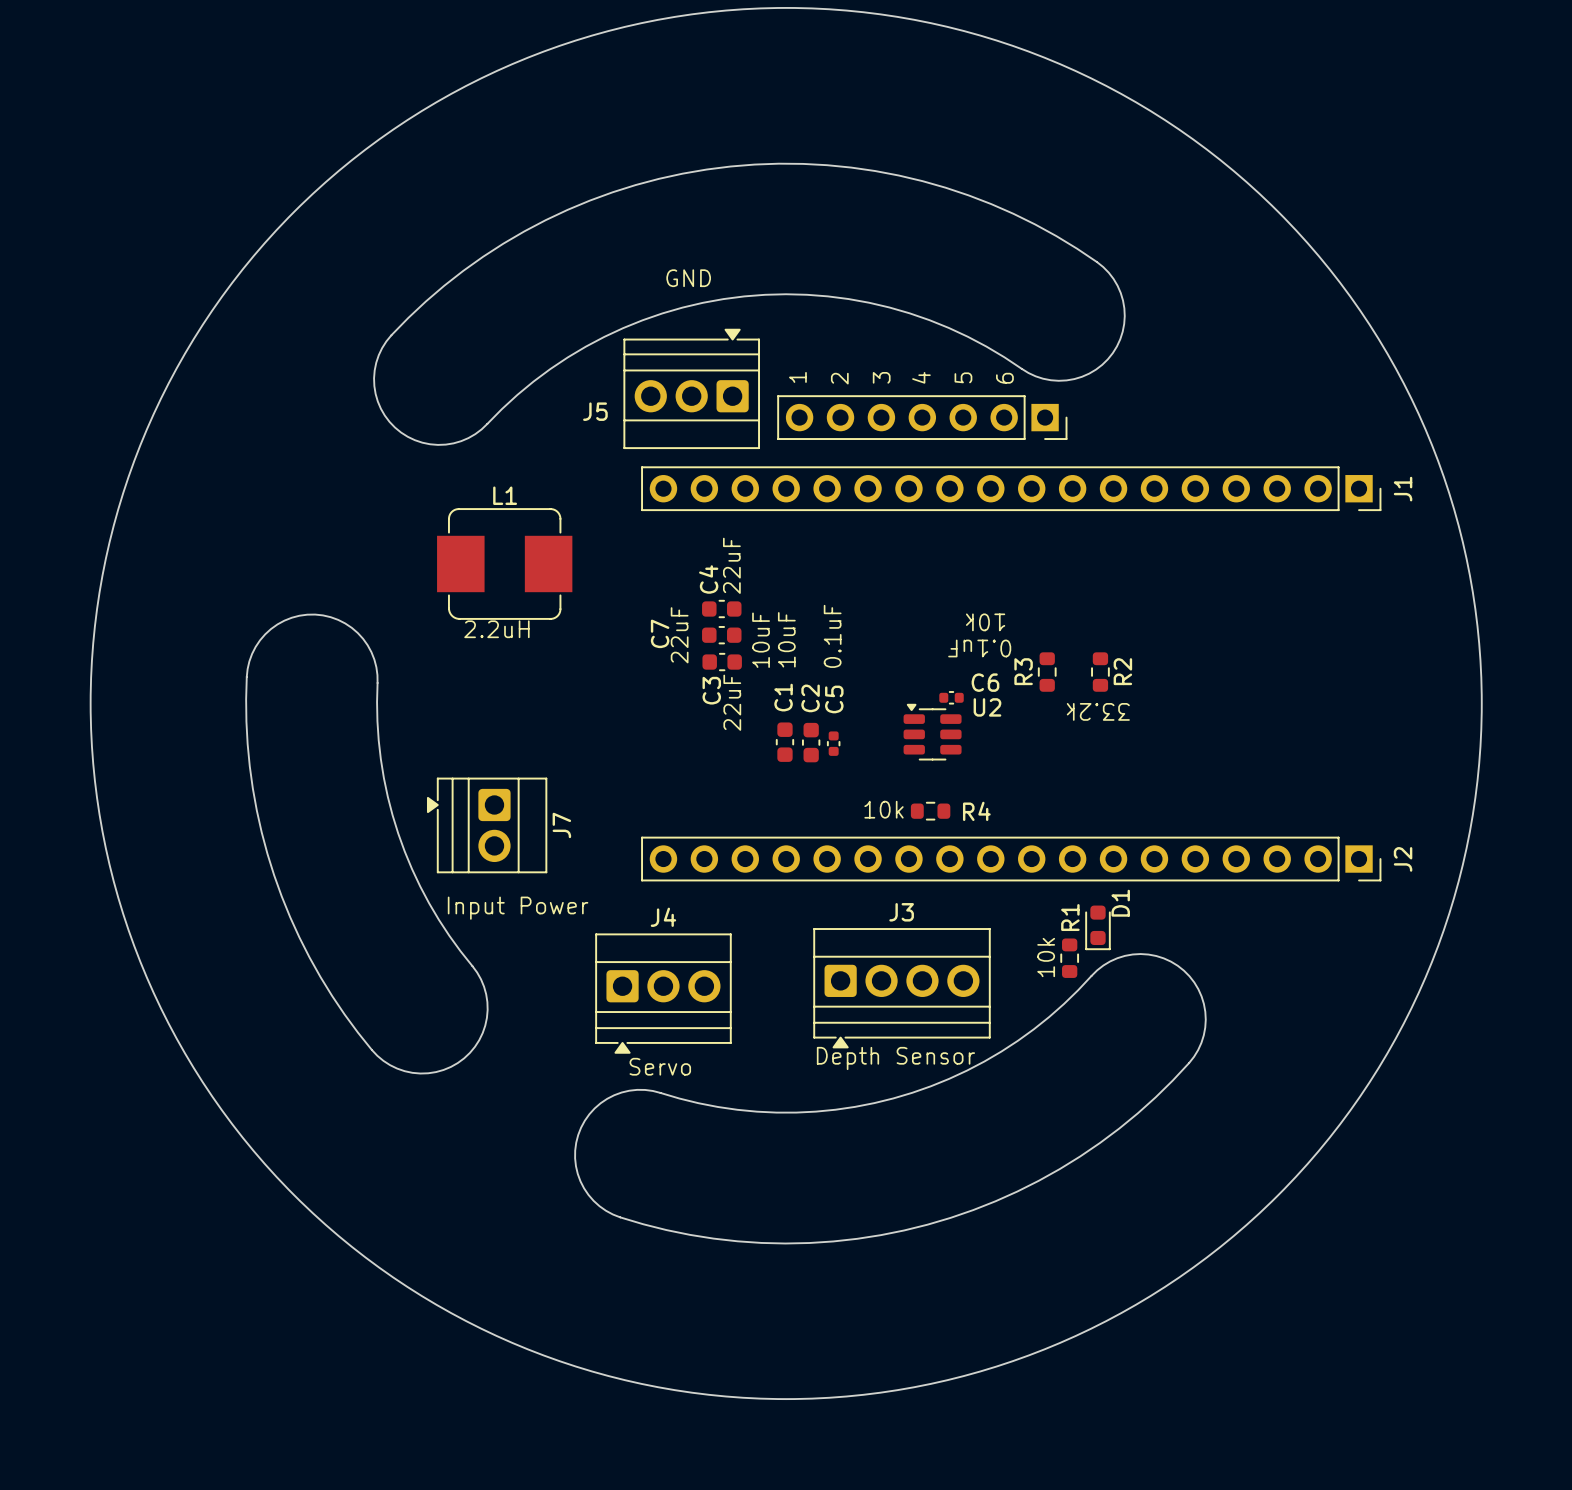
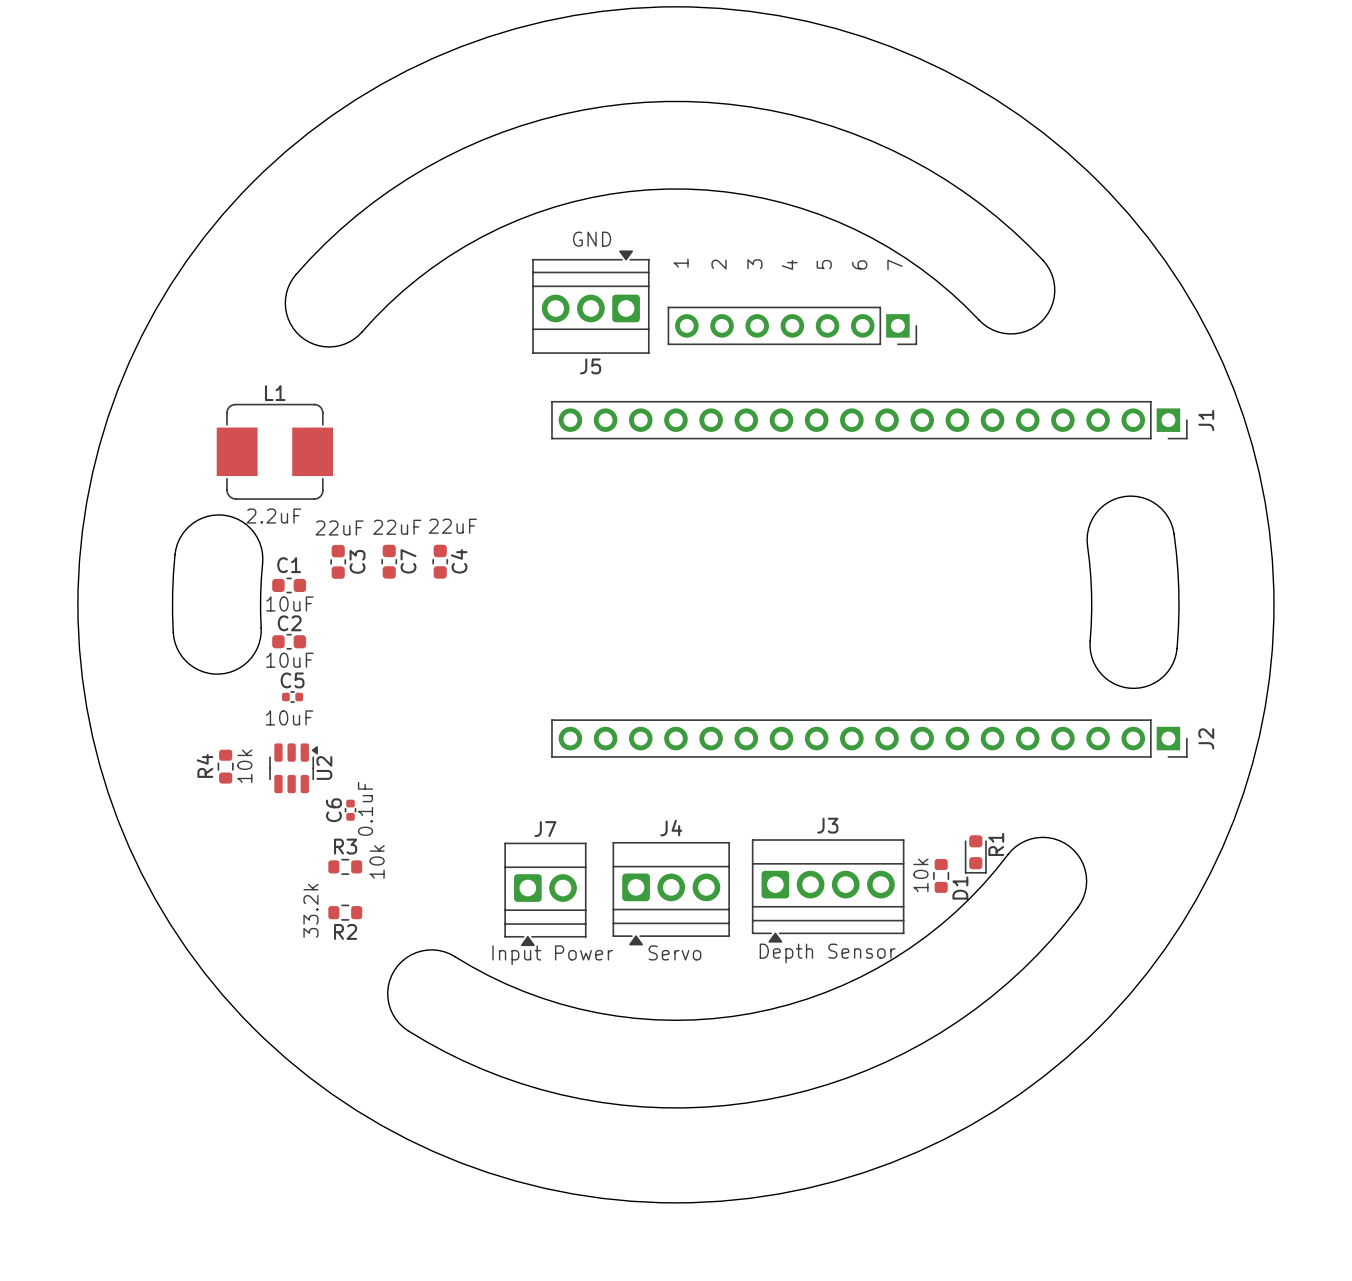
board edge: (1097, 262) (1056, 236) (991, 204) (945, 187) (898, 175) (851, 167) (803, 163) (730, 166) (682, 173) (635, 185) (567, 209) (524, 231) (463, 270) (425, 301) (386, 341) (376, 362) (374, 378) (375, 393) (384, 415) (401, 432) (422, 442) (437, 444) (453, 443) (468, 438) (481, 429) (517, 394) (550, 369) (585, 346) (623, 328) (662, 313) (702, 302) (744, 296) (786, 294) (848, 299) (909, 313) (967, 336) (1035, 376) (1050, 380) (1074, 379) (1089, 373) (1107, 359) (1116, 346) (1122, 331) (1124, 308) (1120, 292) (1113, 278) (1097, 262) -> (1043, 260) (997, 217) (963, 191) (928, 169) (871, 140) (811, 120) (750, 106) (708, 102) (645, 102) (582, 110) (521, 125) (462, 148) (425, 168) (372, 202) (324, 243) (292, 278) (286, 293) (285, 303) (290, 323) (304, 339) (319, 345) (340, 345) (358, 335) (388, 303) (417, 278) (449, 256) (482, 236) (535, 213) (572, 202) (610, 194) (648, 189) (706, 190) (744, 194) (782, 202) (837, 221) (872, 238) (905, 257) (951, 293) (983, 323) (1003, 333) (1015, 333) (1031, 328) (1048, 313) (1054, 297) (1054, 285) (1049, 269) (1043, 260)
text: none -> 7 (894, 264)
text position: 1 (797, 377) -> 1 (681, 263)
text position: 3 (881, 377) -> 3 (754, 264)
text position: 4 (921, 377) -> 4 (789, 264)
text position: 5 (963, 377) -> 5 (824, 264)
text position: 2 (839, 378) -> 2 (719, 264)
text position: 6 (1004, 378) -> 6 (859, 264)
J5 position: (691, 388) -> (590, 302)
J5 name position: J5 (595, 411) -> J5 (590, 366)
part position: (922, 417) -> (792, 325)
L1 position: (504, 563) -> (274, 451)
text: 22uF (731, 565) -> none
text: none -> 2.2uF (273, 516)
C4 rotation: 0° (721, 609) -> 90° clockwise (440, 561)
C4 position: (721, 609) -> (440, 561)
text: none -> 22uF (452, 526)
text: none -> 22uF (397, 527)
text: none -> 22uF (339, 527)
board edge: none -> (1174, 533) (1171, 522) (1161, 508) (1147, 499) (1136, 496) (1119, 497) (1108, 502) (1095, 513) (1090, 523) (1087, 540) (1091, 593) (1090, 651) (1093, 661) (1102, 674) (1119, 686) (1135, 688) (1155, 682) (1167, 672) (1174, 658) (1178, 610) (1174, 533)
text: 10k (985, 622) -> none
text: 2.2uH (496, 629) -> none
C7 name position: C7 (660, 633) -> C7 (408, 561)
text: 22uF (679, 635) -> none
C7 rotation: 0° (721, 635) -> 90° clockwise (389, 561)
C7 position: (721, 635) -> (389, 561)
text: 0.1uF (832, 636) -> none
text: 10uF (786, 639) -> none
text: 10uF (761, 640) -> none
board edge: none -> (175, 554) (172, 593) (173, 632) (179, 652) (189, 664) (203, 672) (224, 673) (239, 667) (251, 657) (260, 638) (262, 558) (257, 537) (247, 525) (238, 519) (223, 515) (207, 516) (193, 523) (185, 530) (177, 544) (175, 554)
text: 0.1uF (979, 648) -> none
C3 rotation: 0° (722, 662) -> 90° clockwise (338, 561)
C3 position: (722, 662) -> (338, 561)
R3 rotation: 0° (1047, 672) -> 90° clockwise (345, 866)
R3 position: (1047, 672) -> (345, 866)
R2 rotation: 0° (1100, 672) -> 90° clockwise (345, 912)
R2 position: (1100, 672) -> (345, 912)
board edge: (246, 676) (247, 744) (256, 810) (274, 875) (290, 917) (309, 957) (344, 1014) (371, 1050) (383, 1060) (397, 1068) (412, 1072) (436, 1072) (450, 1066) (469, 1052) (482, 1033) (487, 1010) (486, 994) (477, 972) (449, 935) (429, 903) (412, 869) (398, 833) (387, 796) (380, 759) (377, 721) (377, 675) (371, 652) (363, 638) (345, 623) (323, 615) (299, 615) (284, 620) (265, 634) (252, 653) (246, 676) -> none
C6 name position: C6 (985, 682) -> C6 (333, 810)
C3 name position: C3 (711, 690) -> C3 (357, 561)
C6 rotation: 0° (951, 697) -> 90° clockwise (350, 810)
C6 position: (951, 697) -> (350, 810)
text: none -> 10uF (289, 603)
text: 22uF (732, 702) -> none
text: 33.2k (1098, 711) -> none
U2 rotation: 0° (932, 732) -> 90° clockwise (293, 768)
U2 position: (932, 732) -> (293, 768)
C1 rotation: 0° (784, 742) -> 90° clockwise (289, 585)
C1 position: (784, 742) -> (289, 585)
C2 rotation: 0° (811, 742) -> 90° clockwise (289, 641)
C2 position: (811, 742) -> (289, 641)
C5 rotation: 0° (833, 743) -> 90° clockwise (292, 697)
C5 position: (833, 743) -> (292, 697)
text: none -> 10uF (289, 660)
text: 10k (884, 809) -> none
R4 rotation: 0° (930, 811) -> 90° clockwise (225, 766)
R4 position: (930, 811) -> (225, 766)
R4 name position: R4 (976, 811) -> R4 (204, 765)
J7 rotation: 0° (487, 825) -> 90° counterclockwise (545, 894)
J7 position: (487, 825) -> (545, 894)
text: none -> 10uF (289, 717)
text: none -> 10k (244, 766)
D1 name position: D1 (1120, 903) -> D1 (960, 888)
text position: Input Power (518, 908) -> Input Power (552, 955)
R1 name position: R1 (1070, 917) -> R1 (996, 844)
D1 position: (1097, 927) -> (975, 854)
text: none -> 0.1uF (365, 808)
text position: 10k (1046, 957) -> 10k (920, 875)
R1 position: (1069, 958) -> (941, 875)
board edge: (1091, 975) (1110, 961) (1132, 954) (1156, 955) (1177, 965) (1194, 982) (1203, 1004) (1205, 1027) (1201, 1042) (1194, 1056) (1172, 1080) (1119, 1128) (1059, 1169) (995, 1201) (950, 1217) (880, 1235) (833, 1241) (761, 1242) (690, 1234) (620, 1217) (605, 1210) (593, 1200) (580, 1181) (575, 1166) (575, 1150) (581, 1127) (594, 1108) (614, 1095) (629, 1090) (645, 1089) (717, 1106) (776, 1112) (835, 1109) (893, 1098) (949, 1078) (1001, 1051) (1049, 1016) (1091, 975) -> (1007, 854) (1025, 840) (1048, 837) (1069, 846) (1080, 858) (1086, 875) (1083, 897) (1077, 907) (1051, 939) (1022, 969) (991, 996) (957, 1021) (922, 1043) (885, 1062) (847, 1077) (787, 1095) (746, 1103) (684, 1107) (622, 1105) (560, 1094) (501, 1076) (444, 1051) (403, 1027) (392, 1014) (388, 1003) (389, 980) (397, 965) (411, 954) (433, 949) (449, 953) (488, 975) (523, 991) (560, 1003) (597, 1012) (635, 1018) (693, 1019) (732, 1016) (770, 1009) (807, 999) (843, 985) (877, 968) (910, 947) (941, 924) (969, 898) (1007, 854)
J3 position: (902, 988) -> (828, 890)
J4 position: (663, 993) -> (671, 893)
text: none -> 10k (377, 861)
text position: Depth Sensor (895, 1058) -> Depth Sensor (827, 953)
text: none -> 33.2k (310, 910)
text position: Servo (660, 1066) -> Servo (674, 952)

